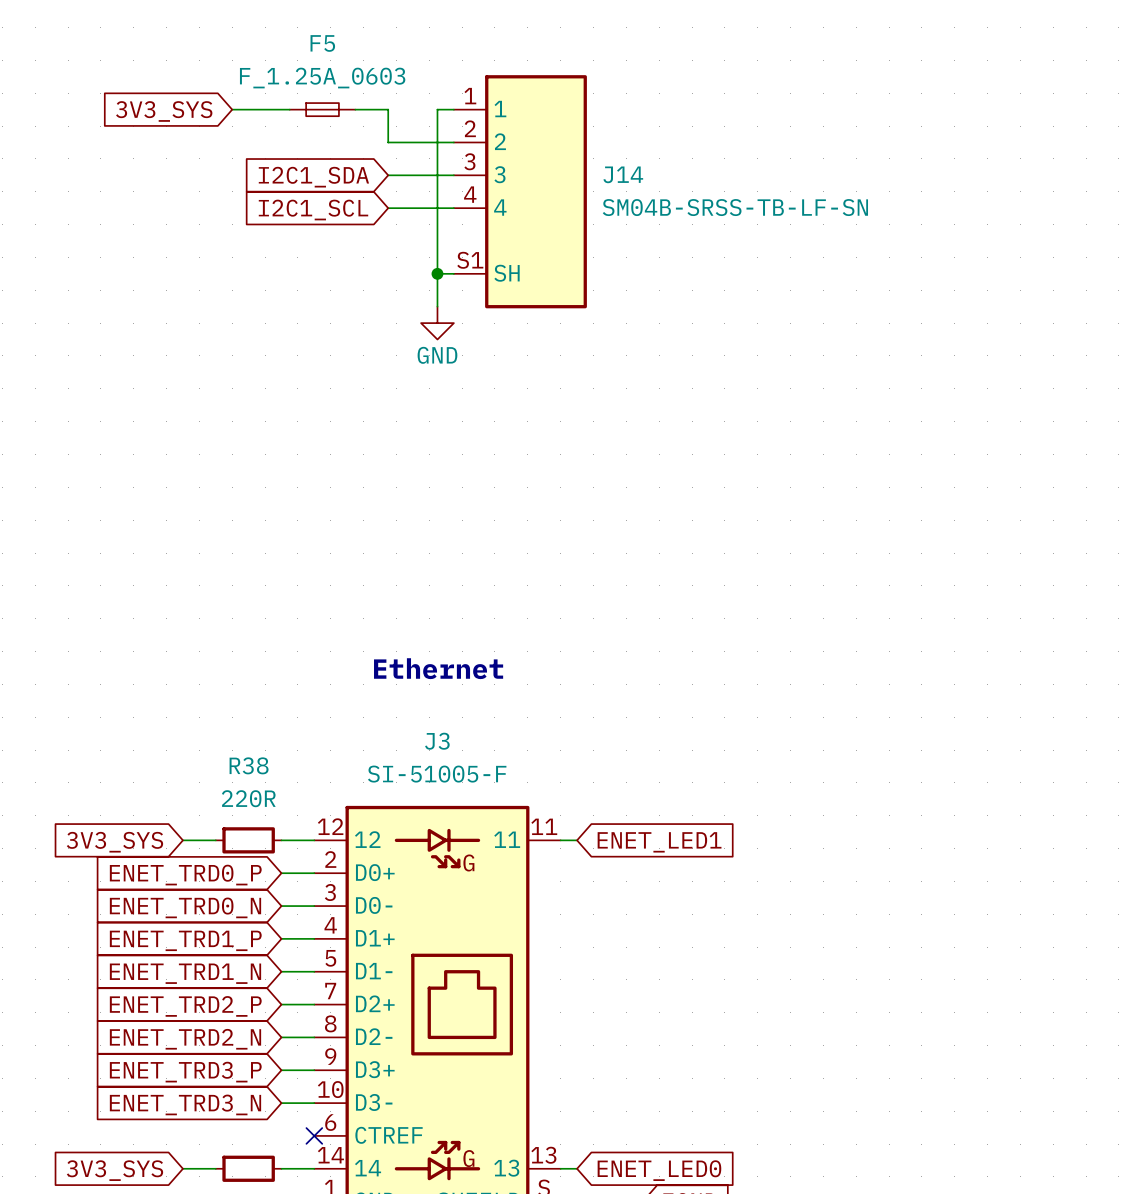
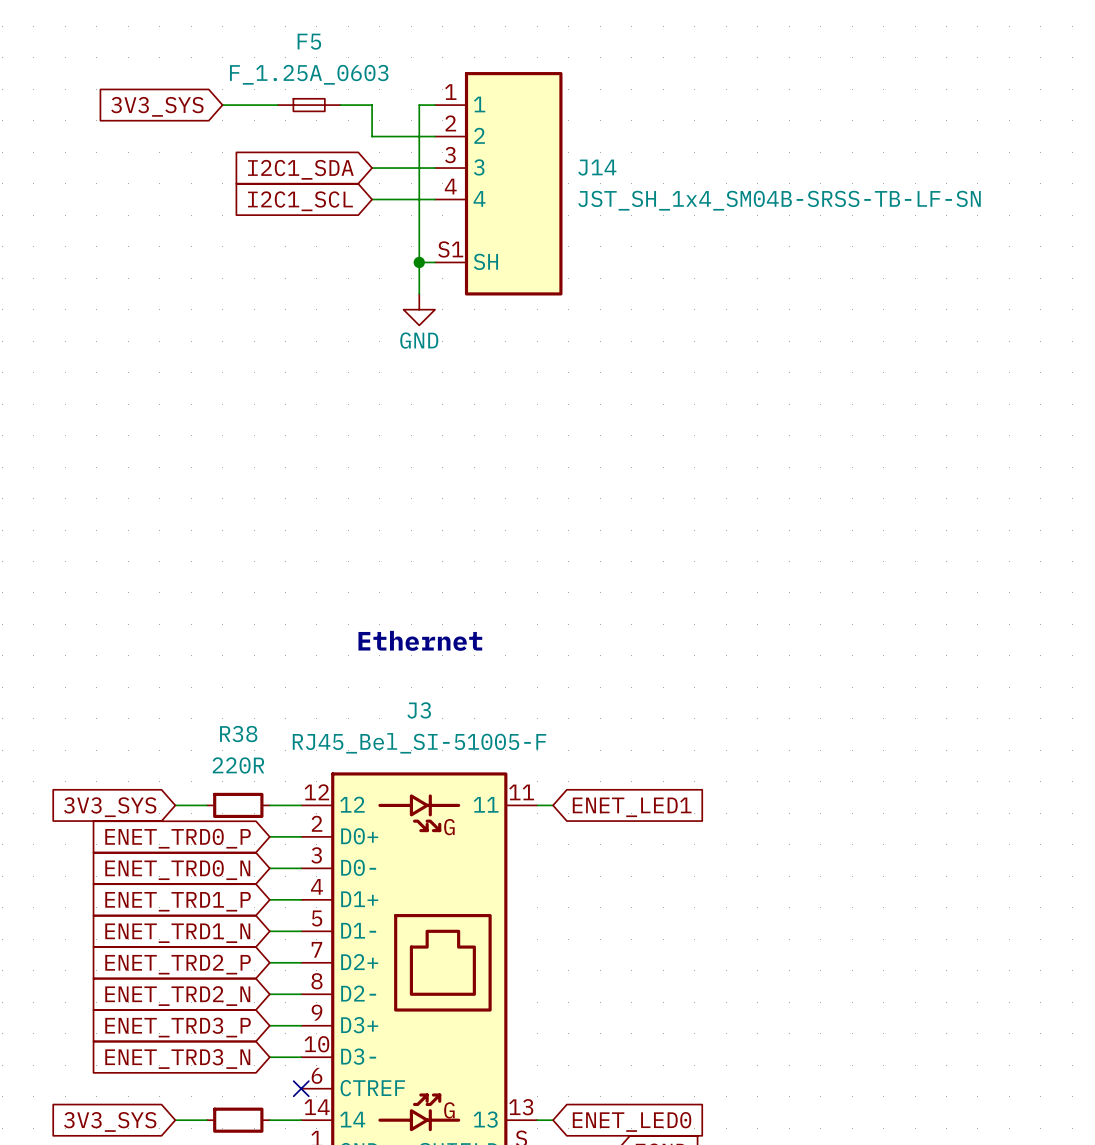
J14 value: SM04B-SRSS-TB-LF-SN (735, 207) -> JST_SH_1x4_SM04B-SRSS-TB-LF-SN (779, 200)
J3 value: SI-51005-F (437, 774) -> RJ45_Bel_SI-51005-F (419, 743)

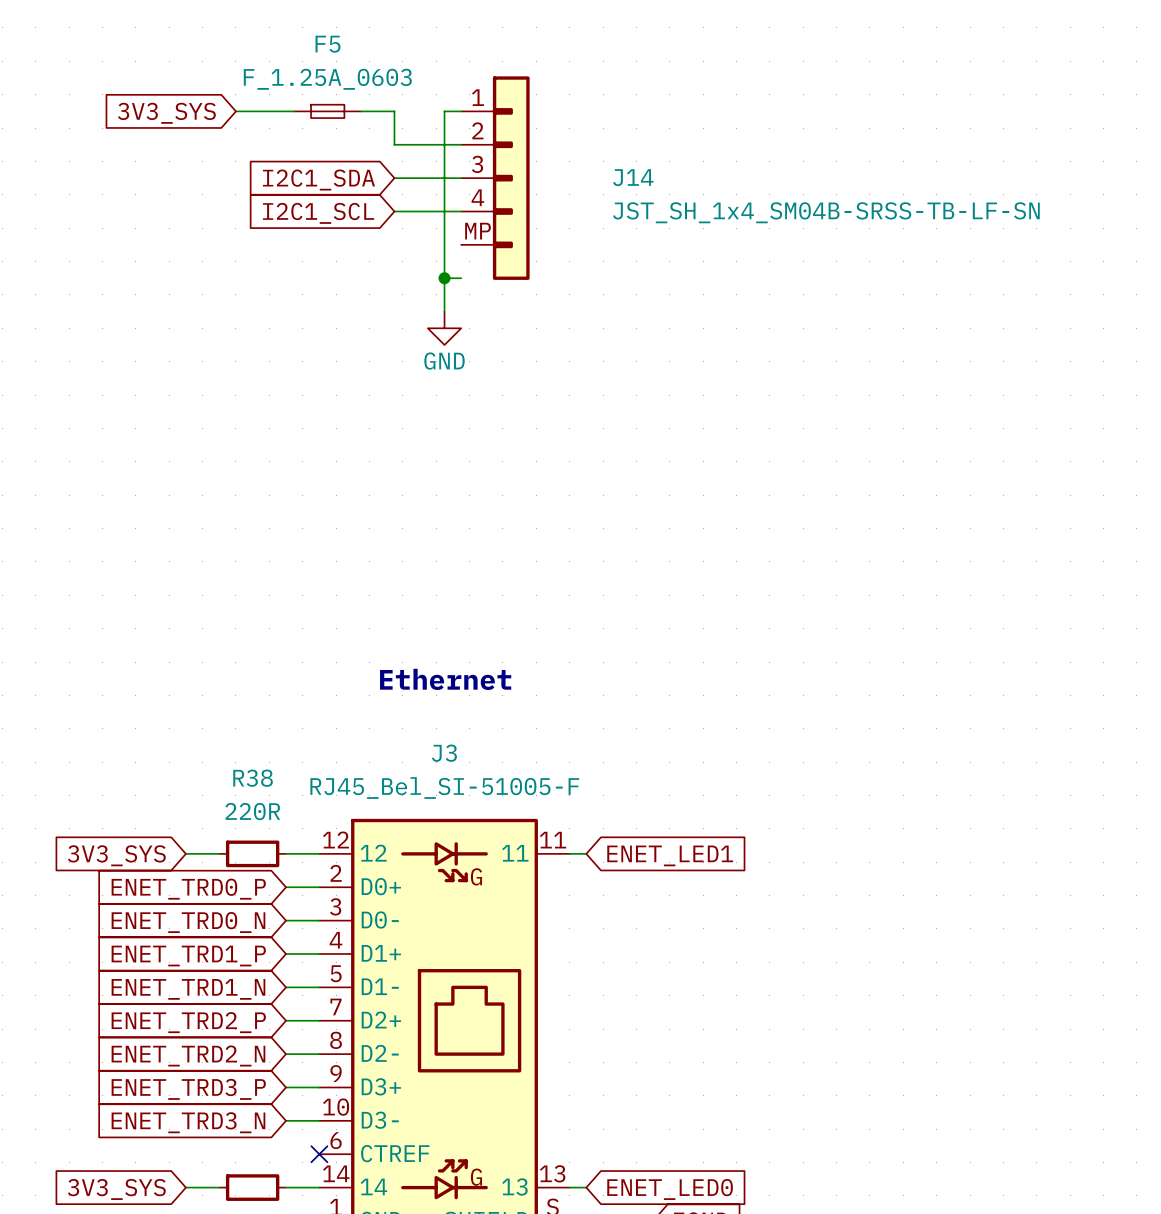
J14 symbol: [435, 72, 563, 296] -> [461, 76, 530, 280]

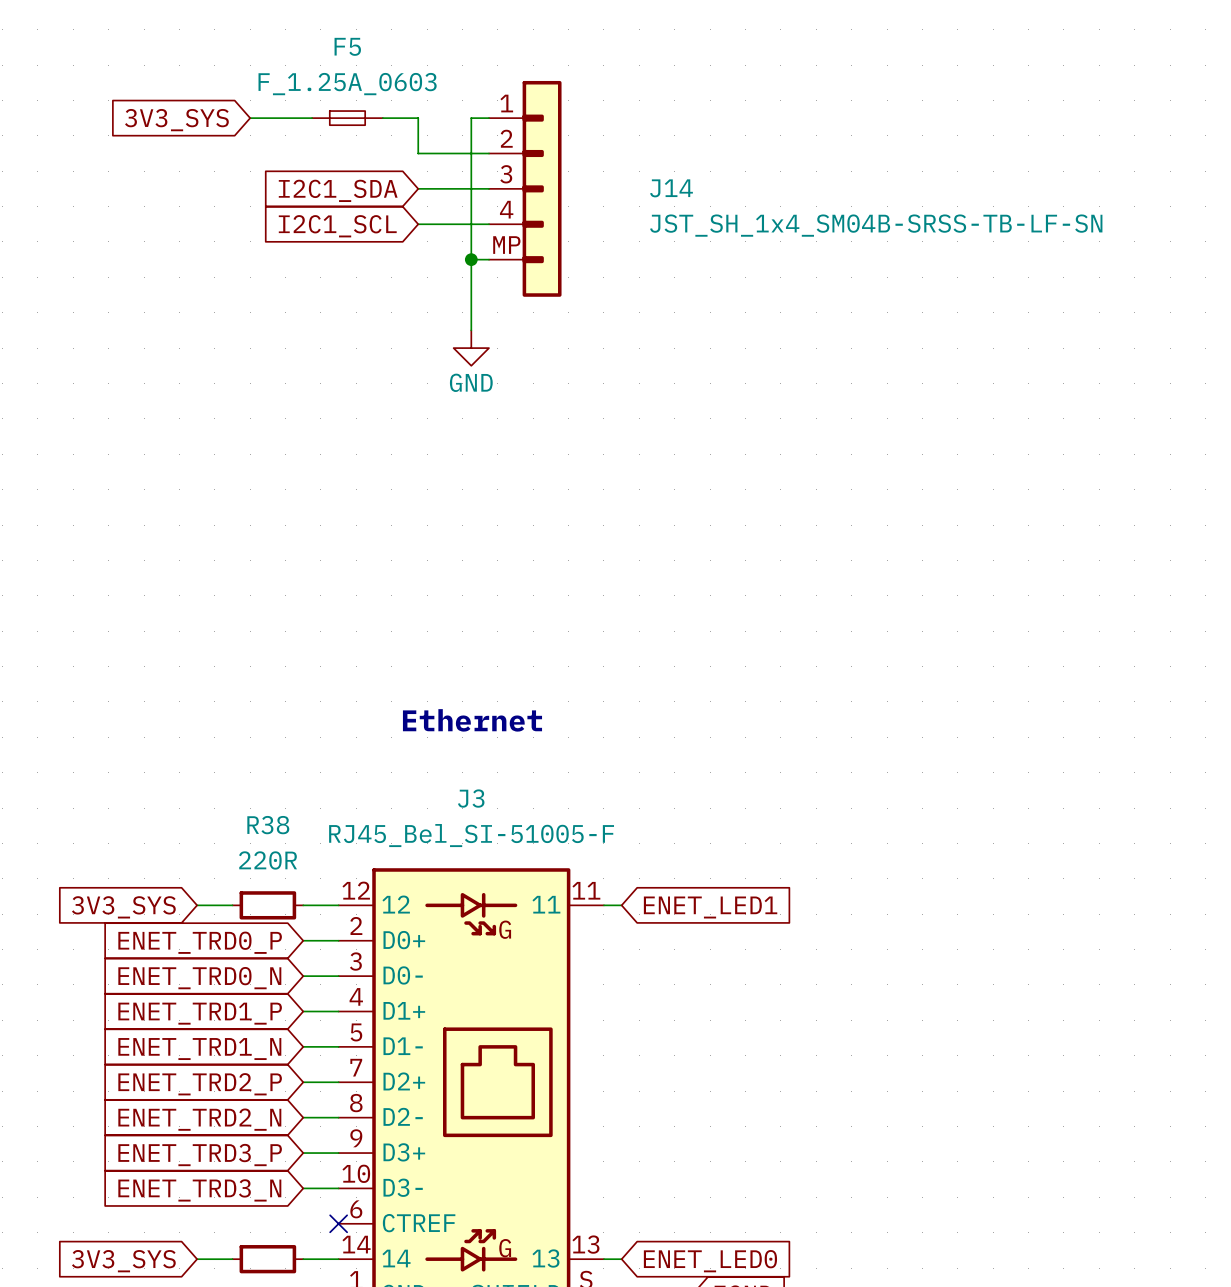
wire: (444, 278) (461, 278) -> (471, 259) (489, 259)
junction position: (444, 278) -> (471, 259)

